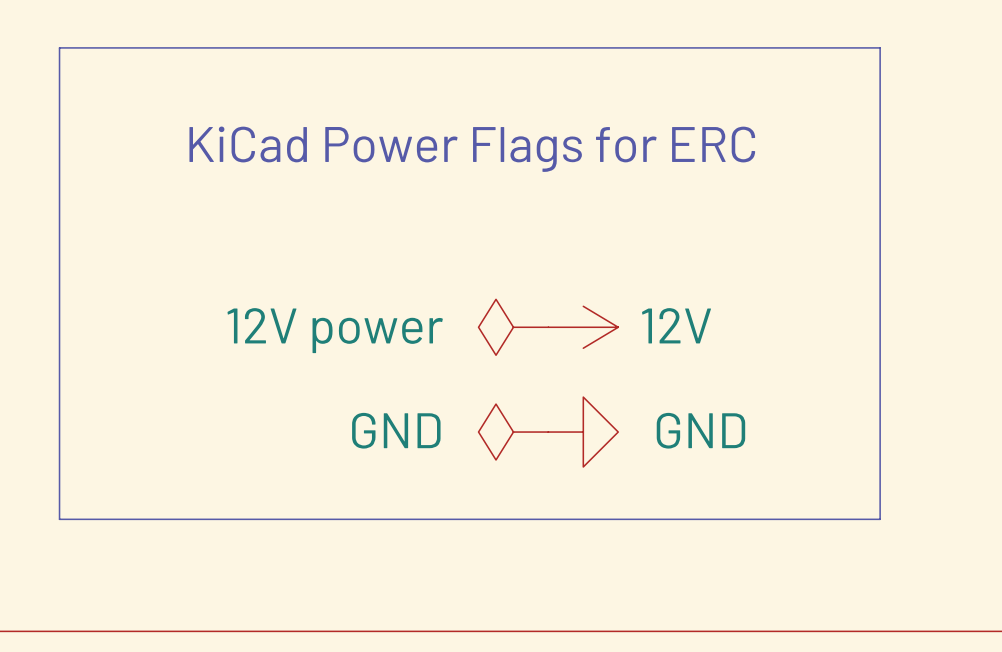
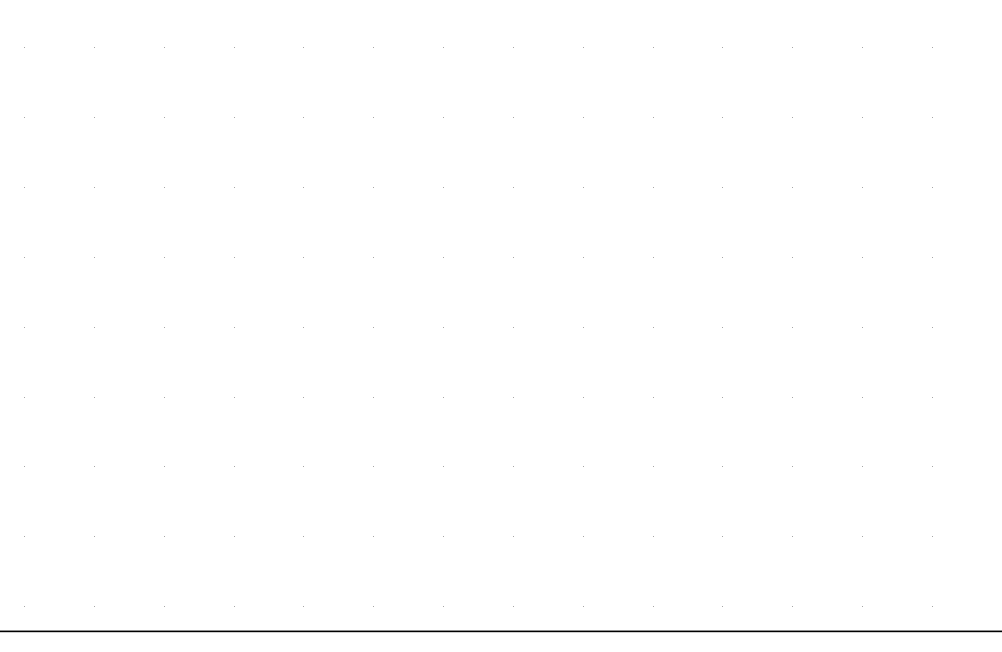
line: (59, 47) (880, 47) (880, 519) (59, 519) (59, 47) -> none
text: KiCad Power Flags for ERC (472, 149) -> none
power symbol: 12V power (513, 327) -> none
power symbol: 12V (583, 327) -> none
power symbol: GND (513, 432) -> none
power symbol: GND (583, 432) -> none

